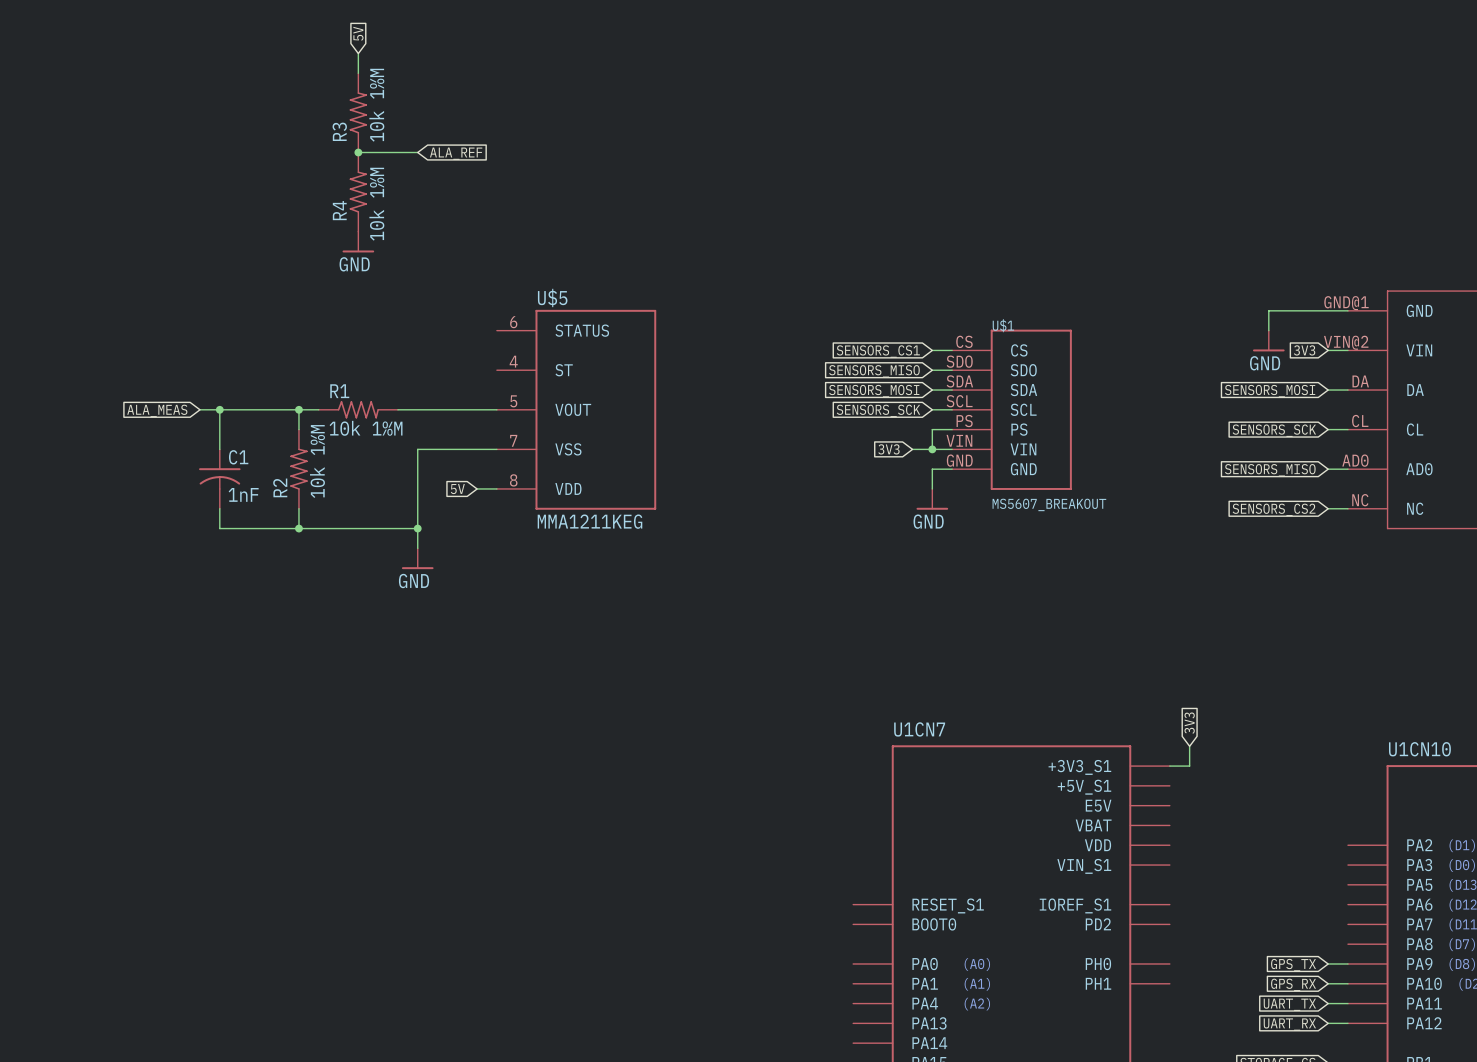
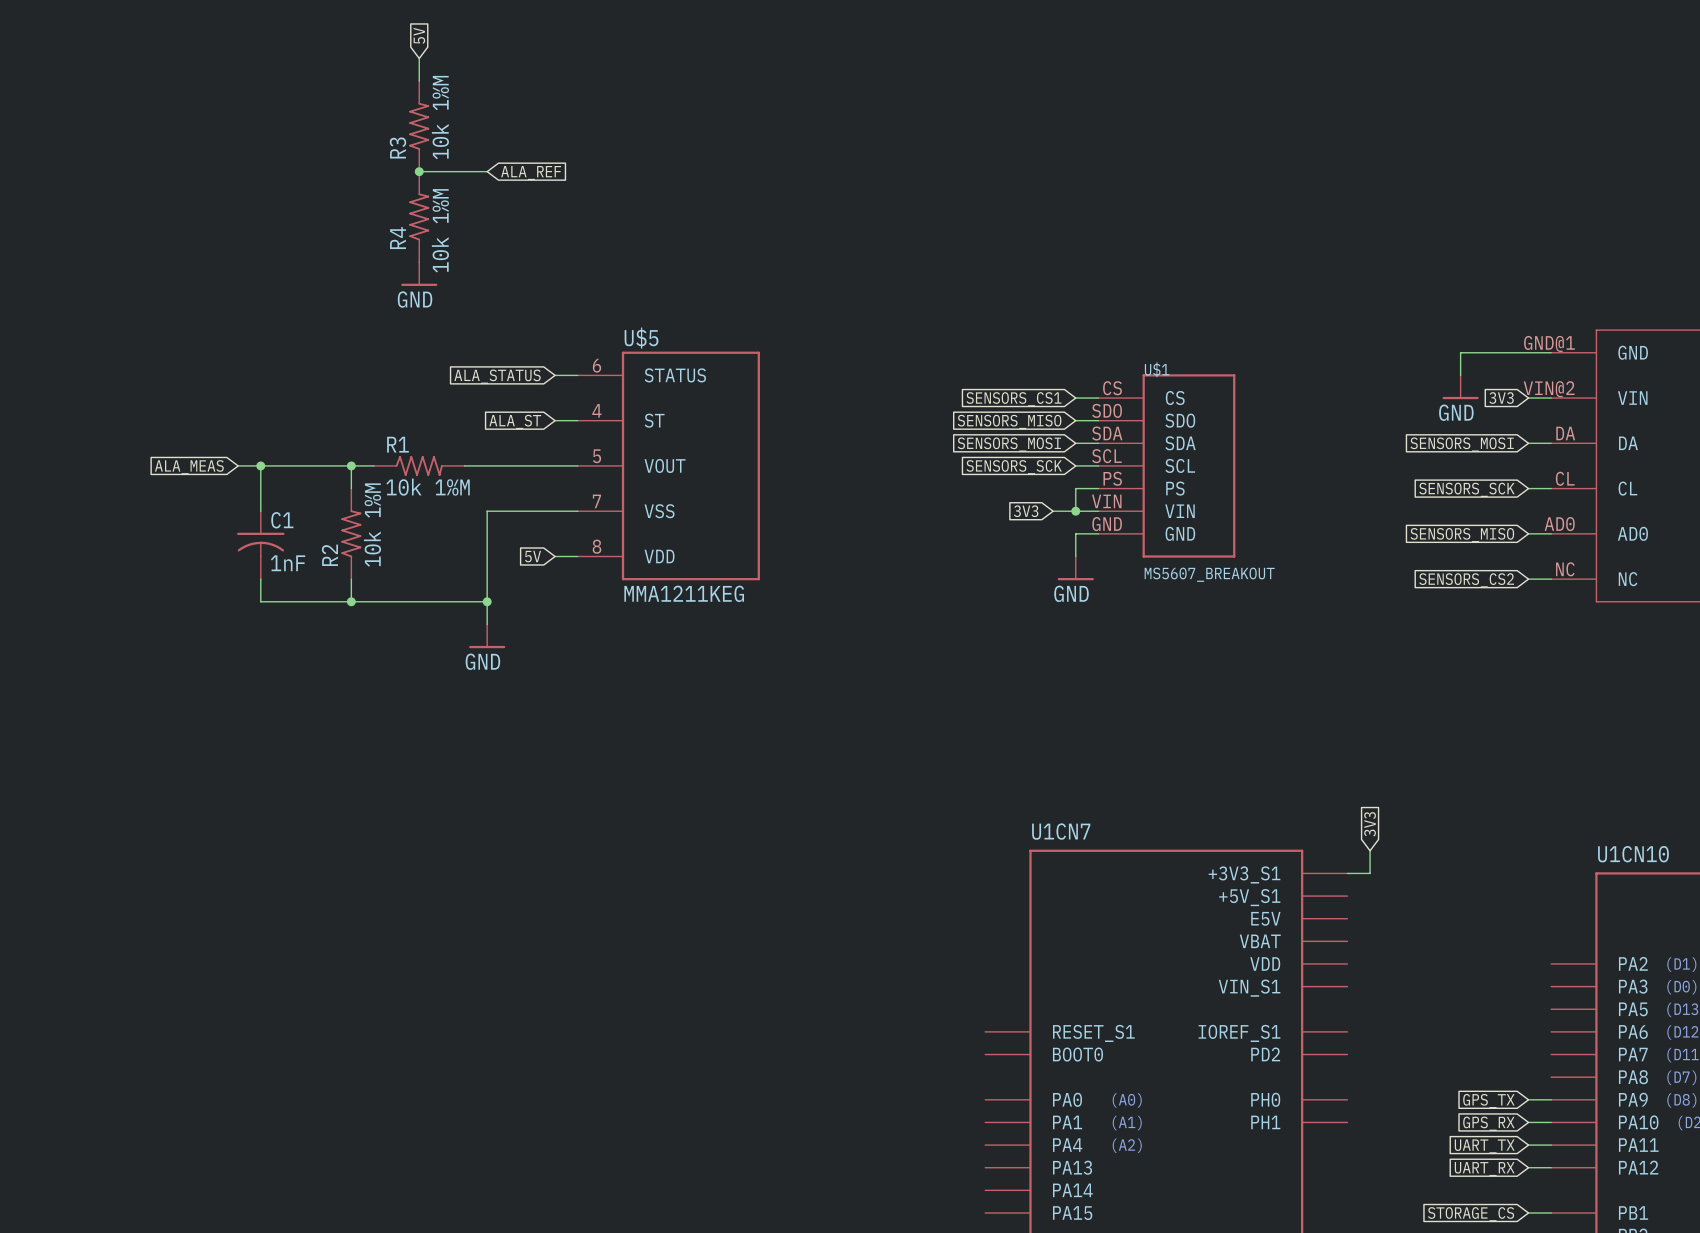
wire: none -> (555, 375) (577, 375)
global label: none -> ALA_STATUS (497, 376)
wire: none -> (555, 420) (577, 420)
global label: none -> ALA_ST (515, 421)

